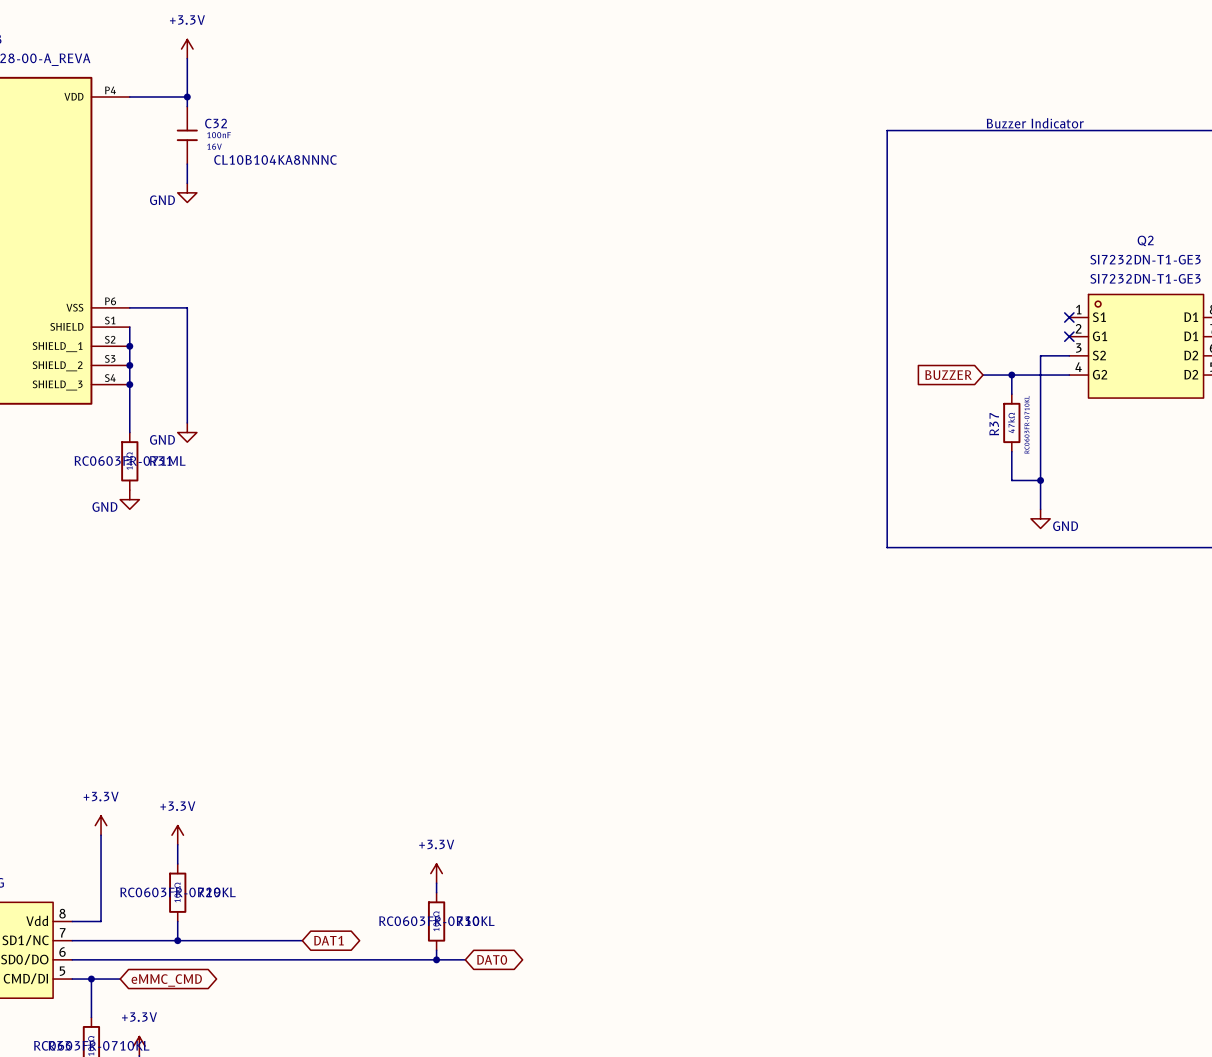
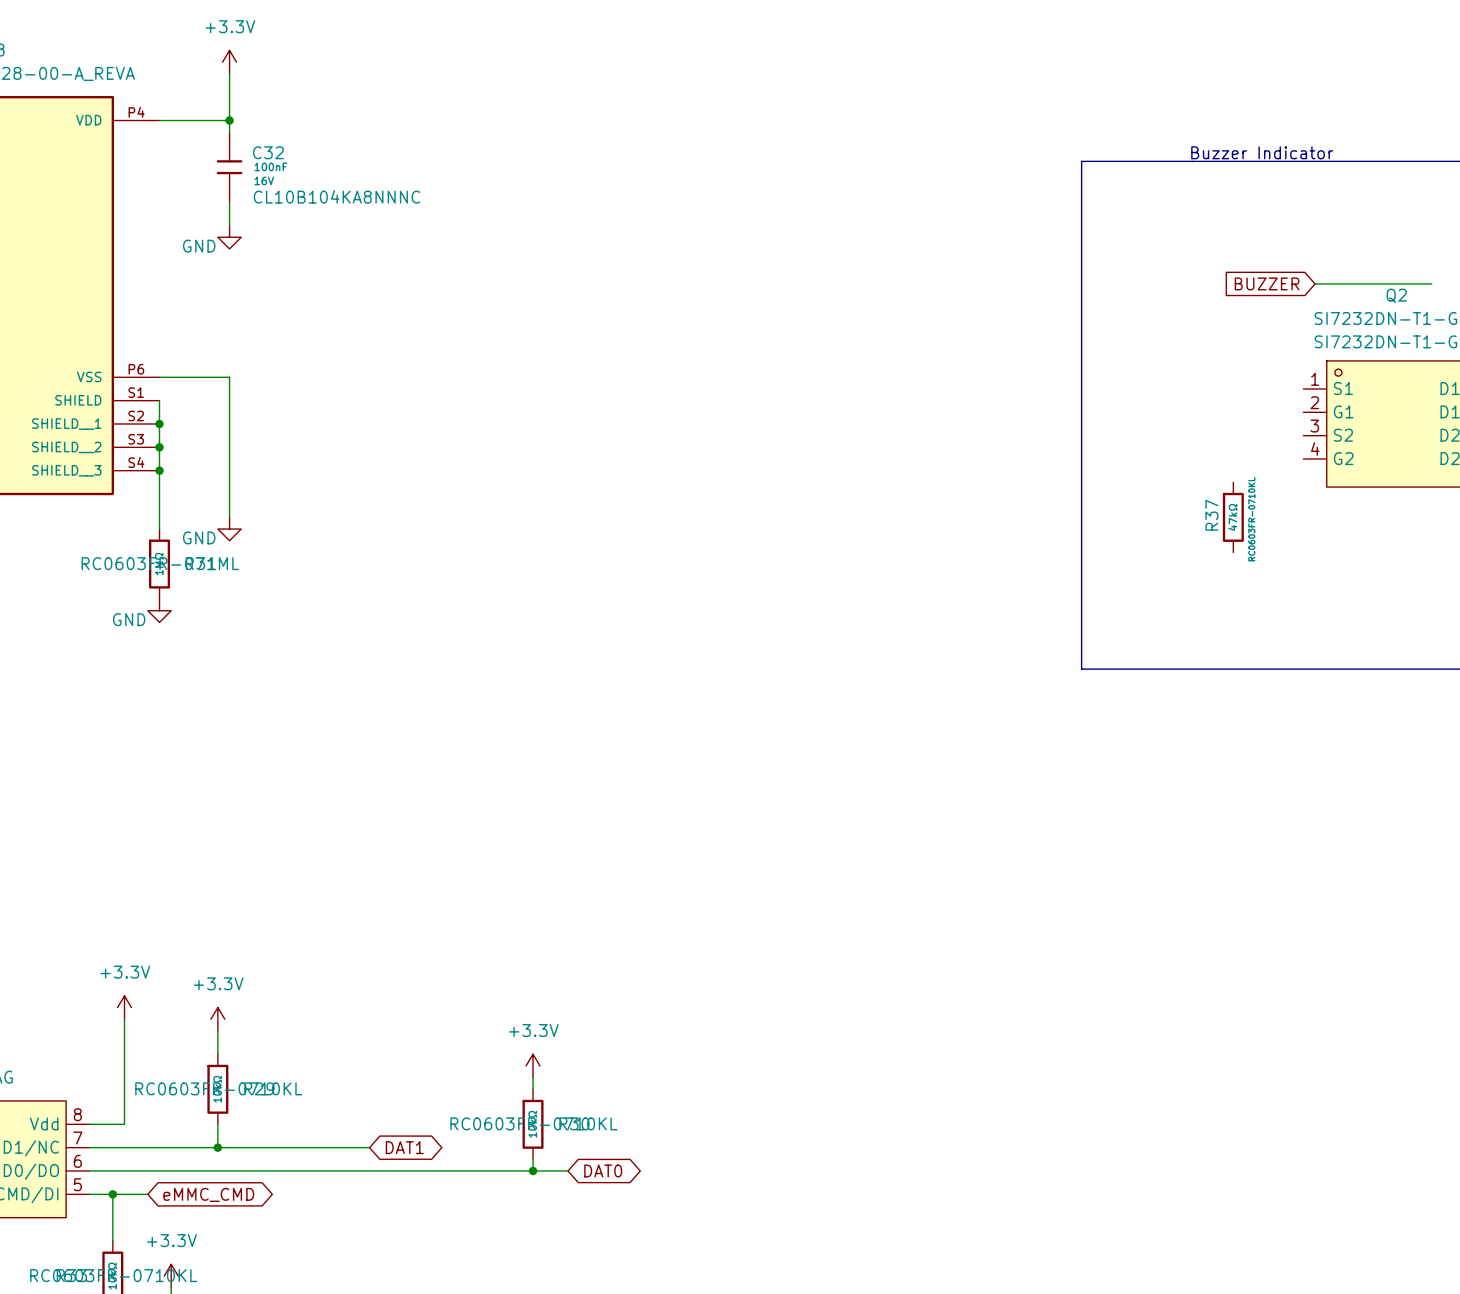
wire: none -> (1315, 283) (1431, 283)
no-connect mark: (1069, 317) -> none
no-connect mark: (1069, 336) -> none
wire: (1069, 355) (1040, 355) (1040, 509) -> none
global label position: BUZZER (948, 375) -> BUZZER (1267, 283)
wire: (983, 375) (1069, 375) -> none
wire: (1011, 375) (1011, 394) -> none
junction: (1011, 375) -> none
wire: (1011, 451) (1011, 480) (1040, 480) -> none
junction: (1040, 480) -> none
power symbol: GND (1040, 518) -> none

